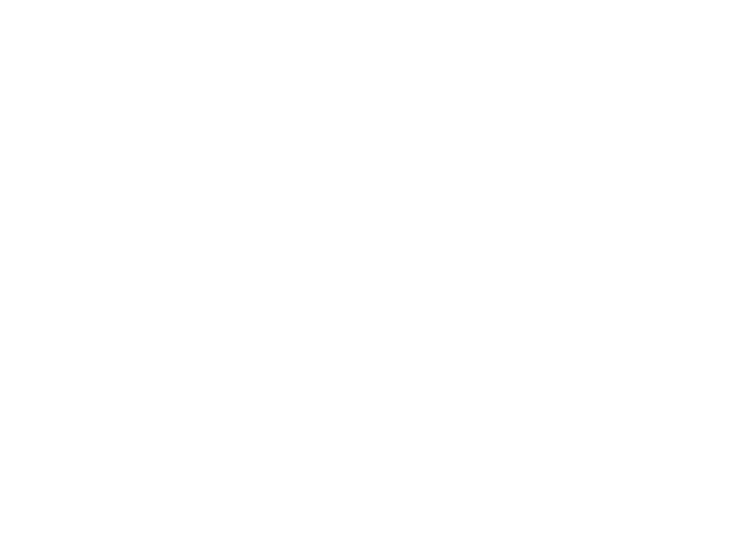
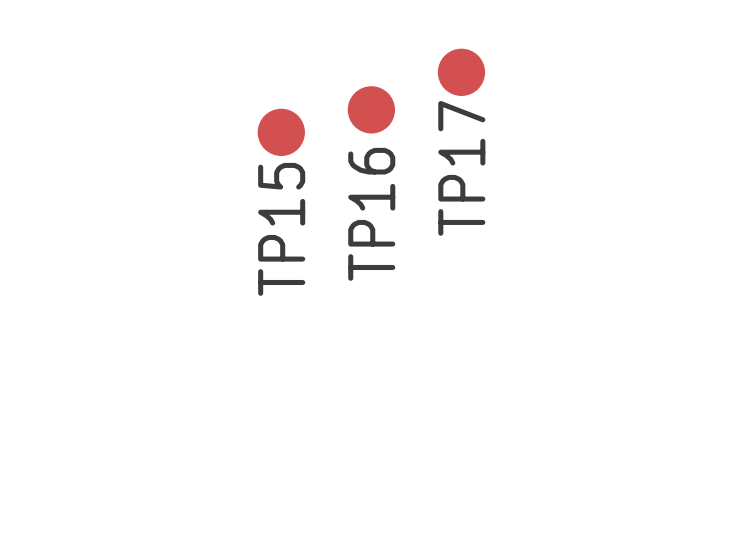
TP17: none -> (461, 72)
TP16: none -> (371, 109)
TP15: none -> (281, 132)

